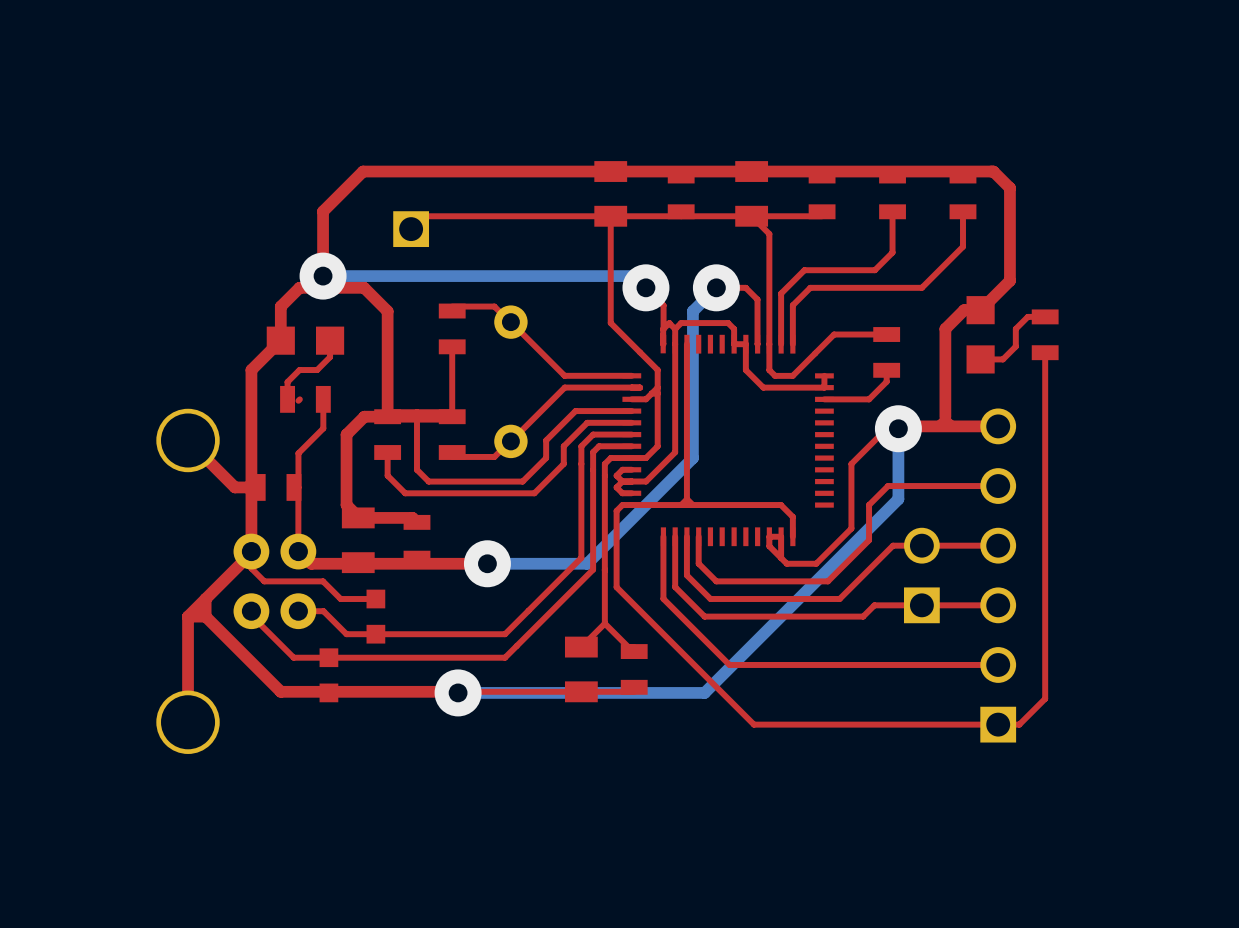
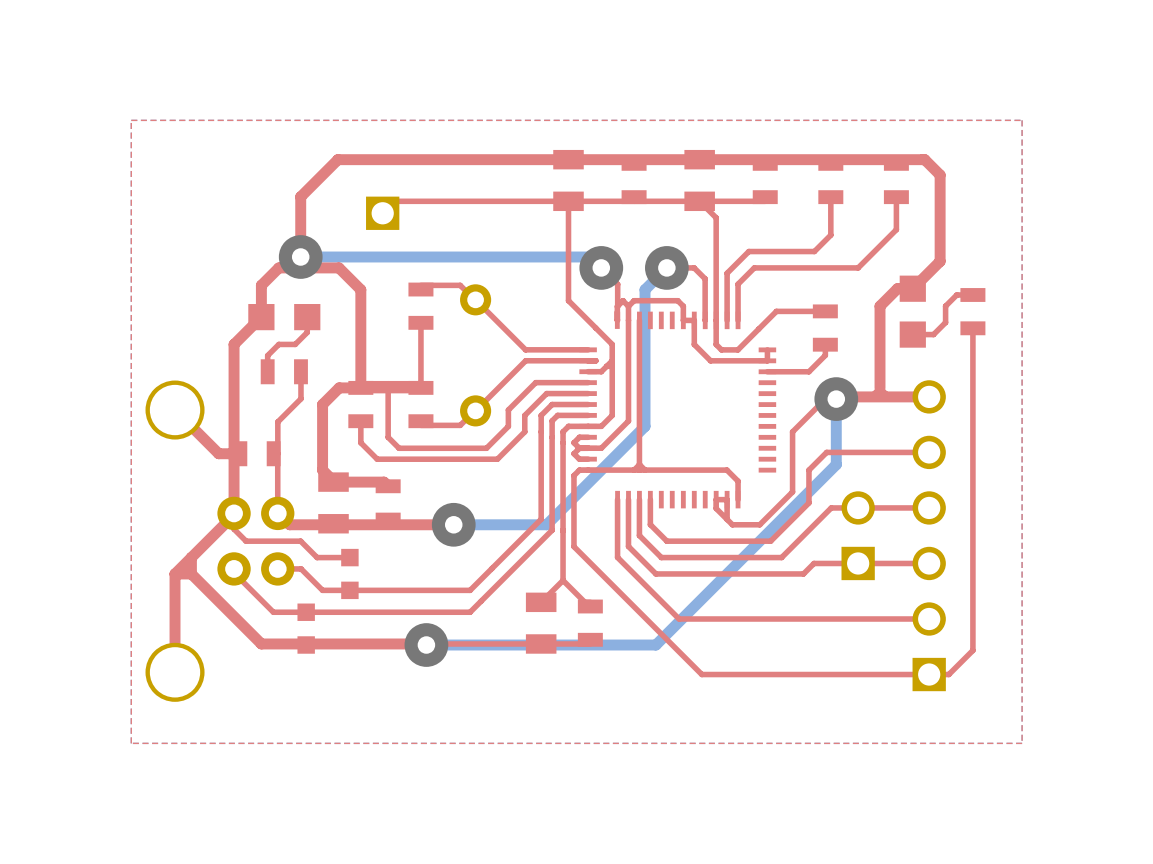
top zone outline: none -> (131, 120) (131, 743) (1022, 743) (1022, 120) (131, 120)
top track: (299, 399) (298, 400) -> none

